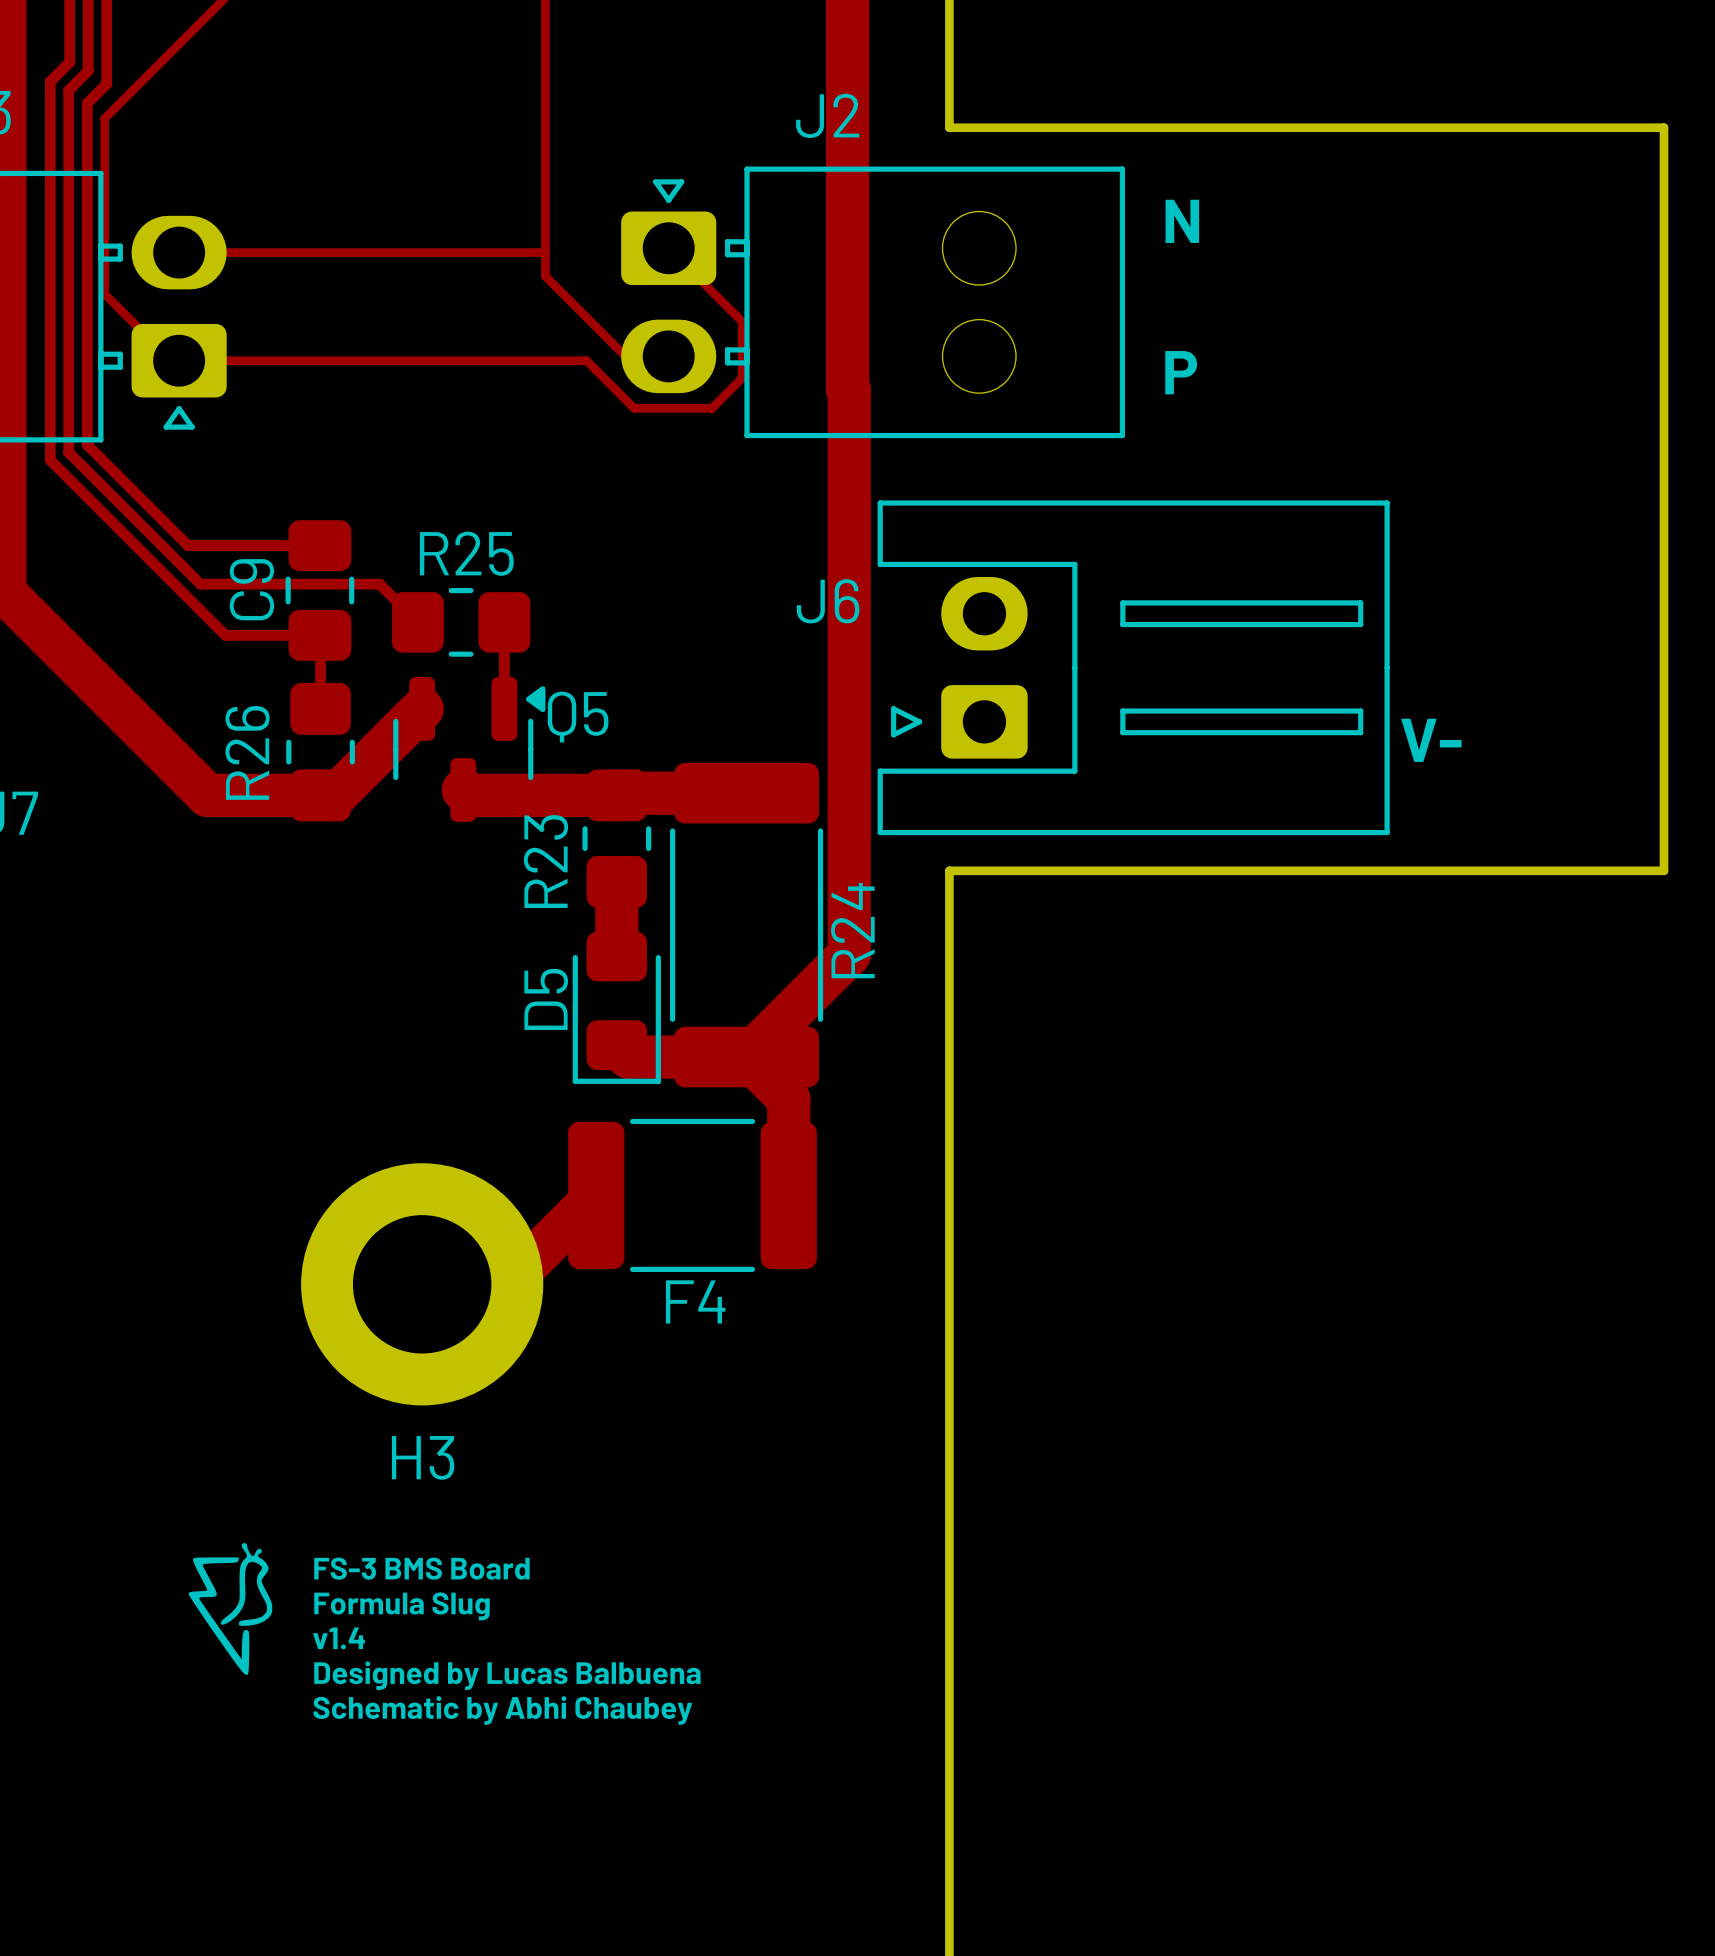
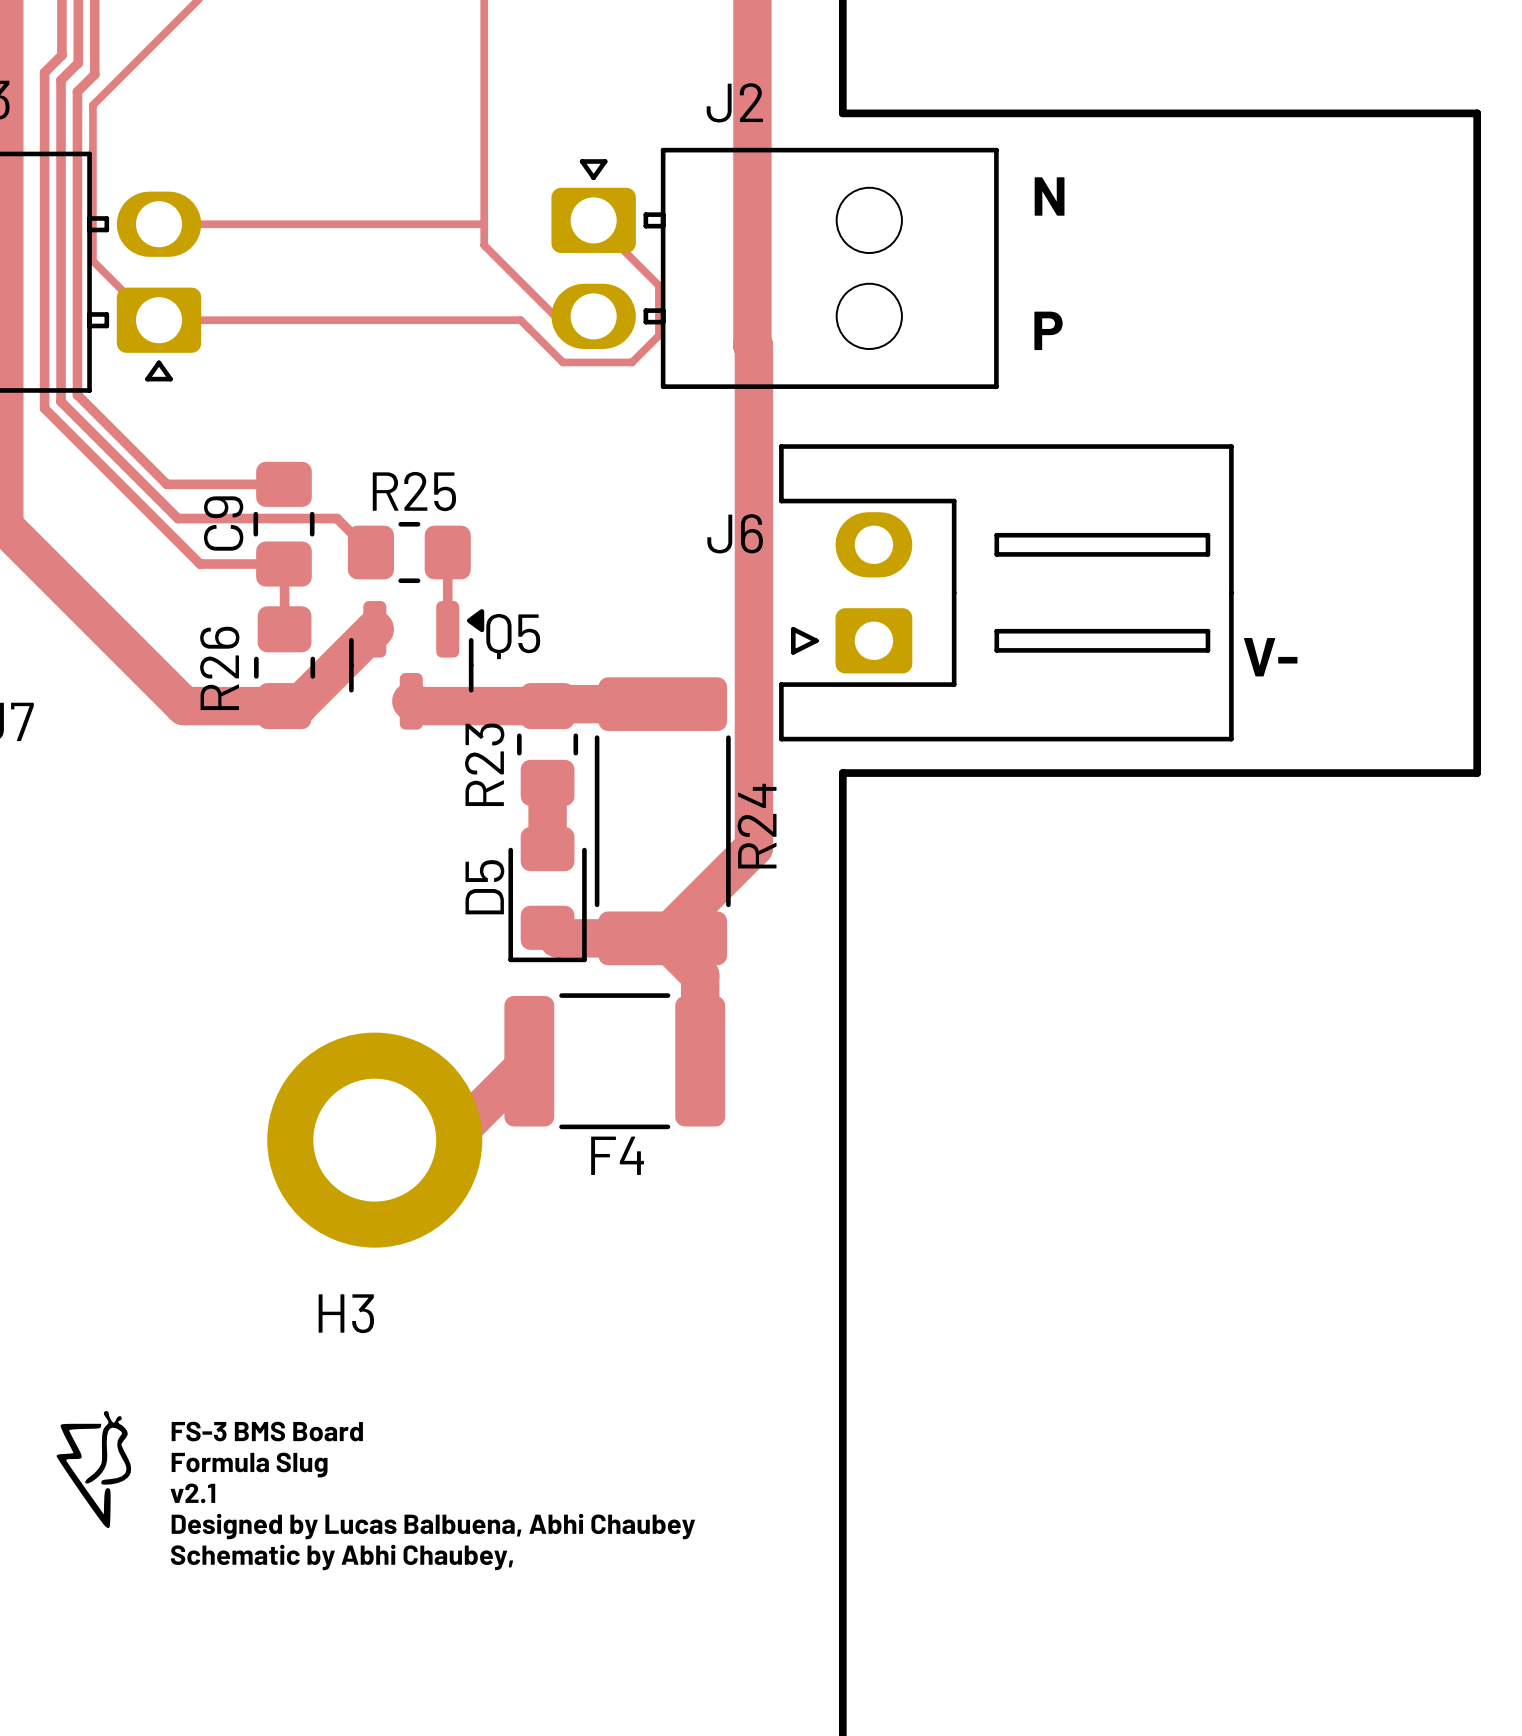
H3 name position: H3 (423, 1457) -> H3 (346, 1313)
text position: FS-3 BMS Board (421, 1568) -> FS-3 BMS Board (267, 1431)
text position: Formula Slug (401, 1606) -> Formula Slug (249, 1465)
drawing position: (230, 1608) -> (93, 1469)
text: v1.4 (338, 1638) -> none
text: Designed by Lucas Balbuena (507, 1675) -> Designed by Lucas Balbuena, Abhi Chaubey (433, 1526)
text: none -> v2.1 (192, 1493)
text: Schematic by Abhi Chaubey (502, 1710) -> Schematic by Abhi Chaubey, (342, 1557)

